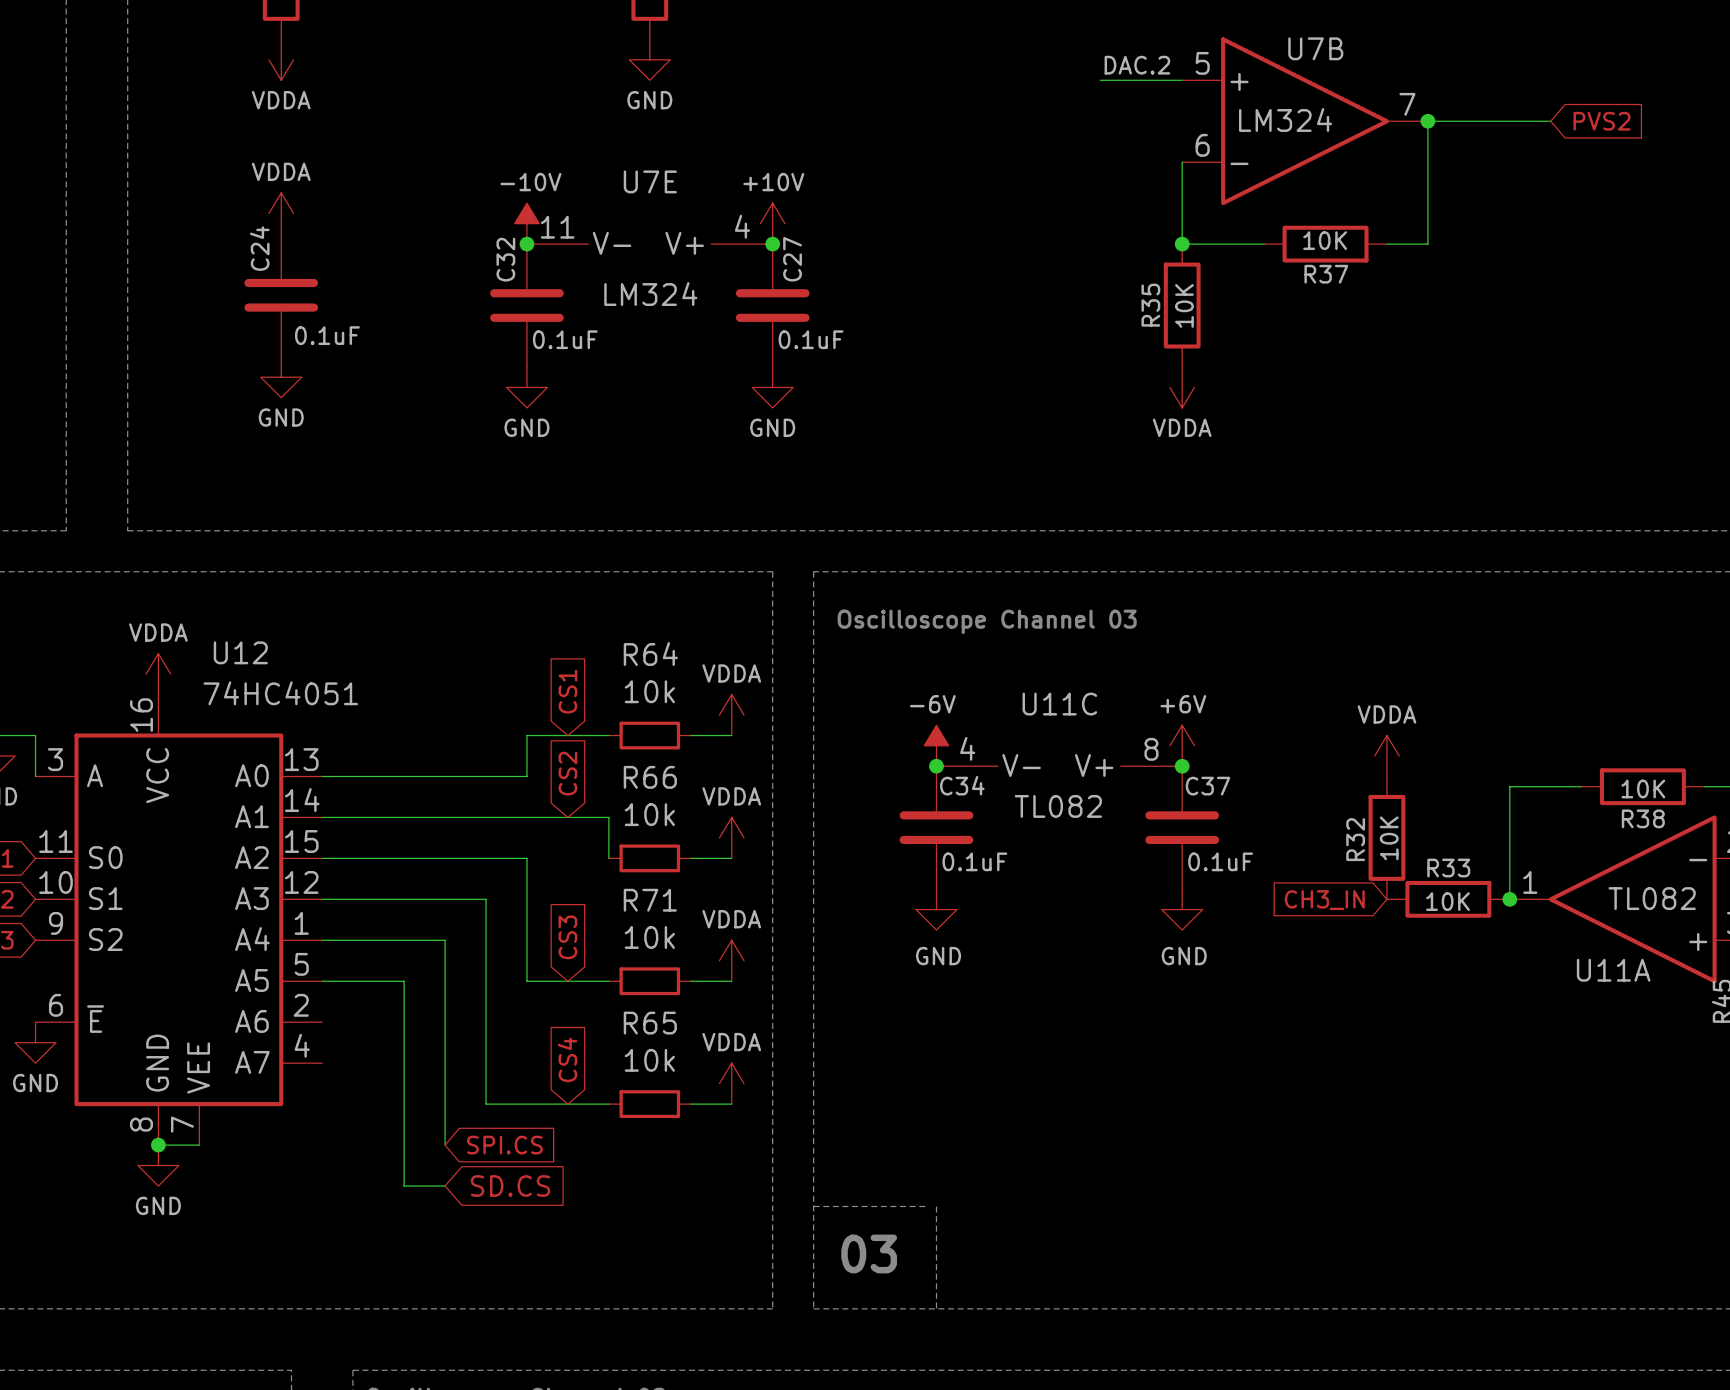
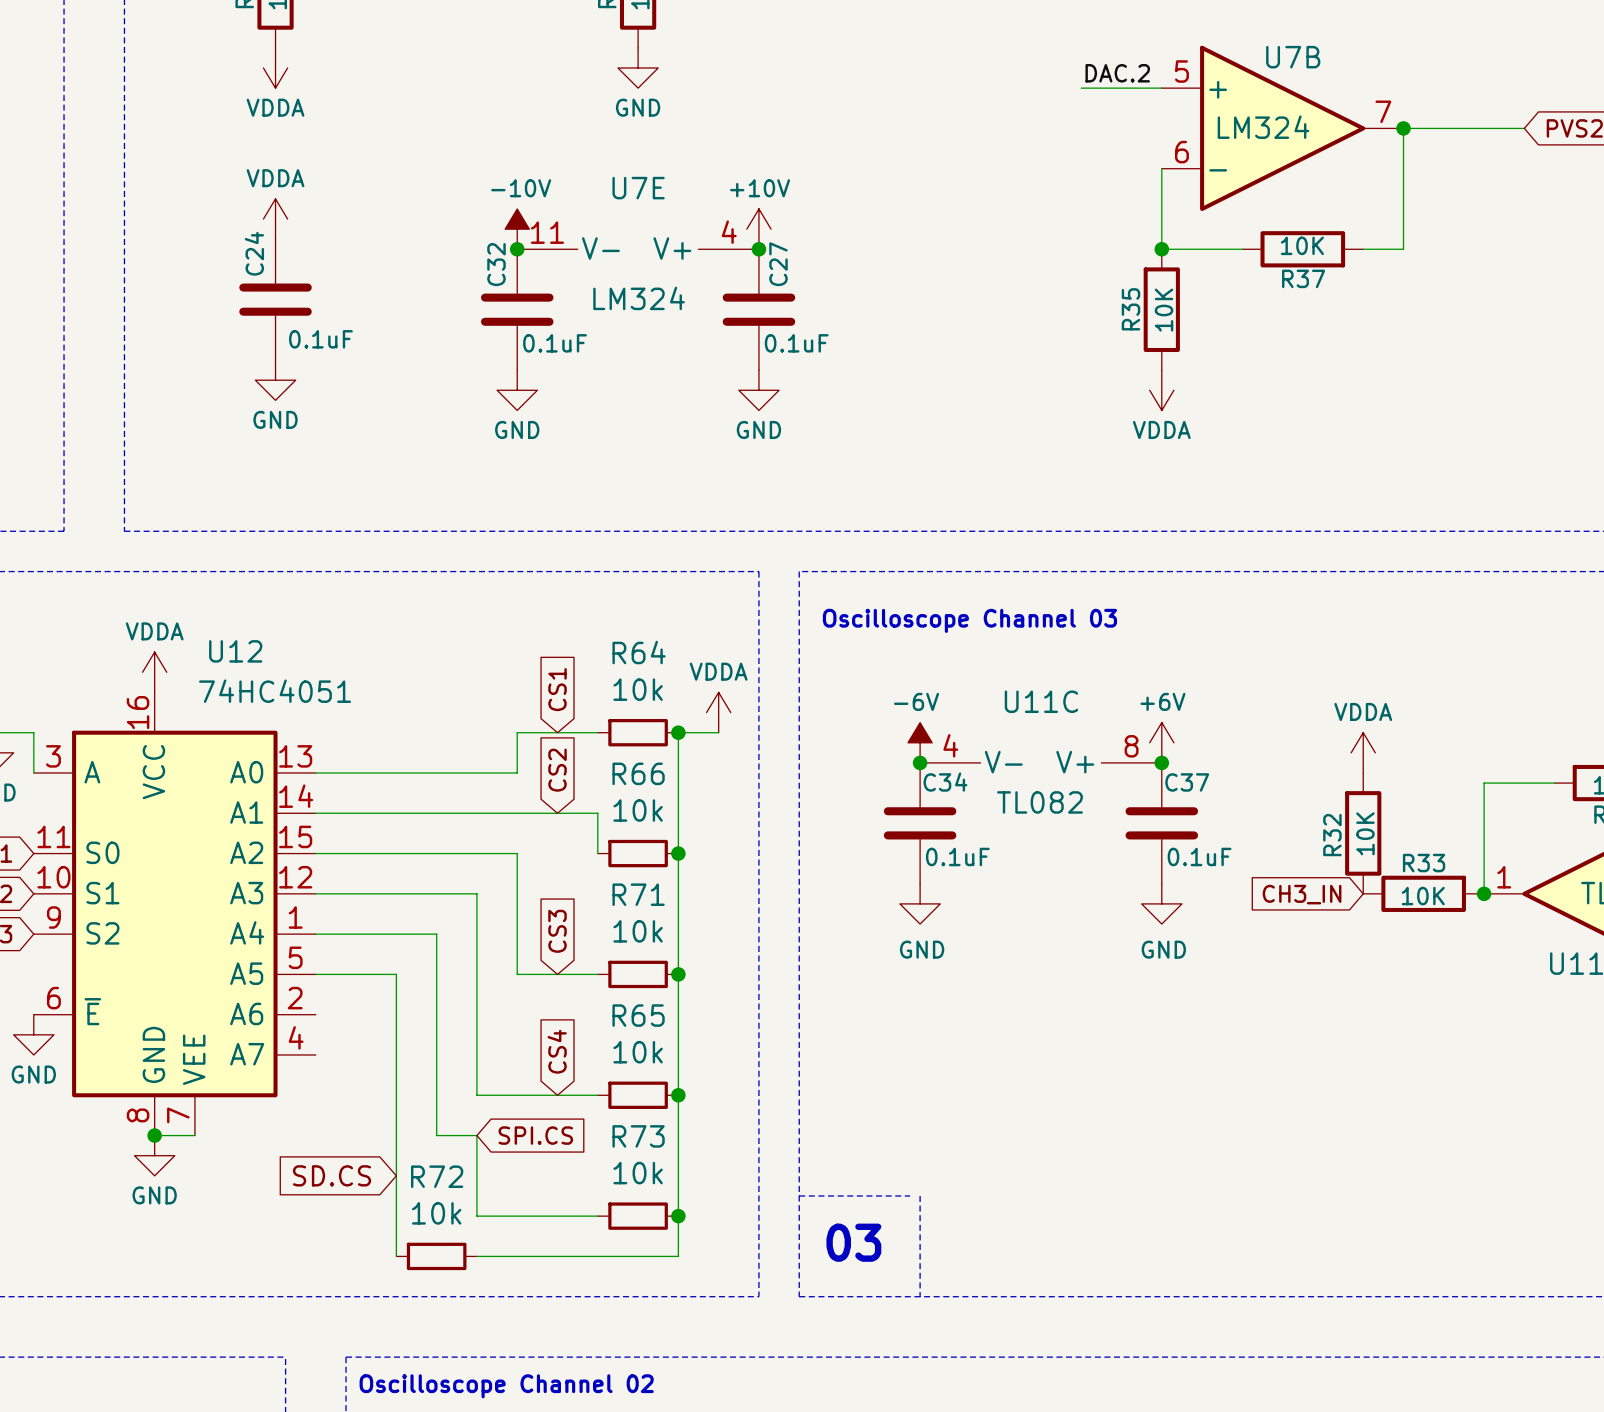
wire: none -> (678, 732) (678, 1256) (476, 1256)
junction: none -> (678, 732)
power symbol: VDDA (731, 837) -> none
wire: (690, 858) (731, 858) -> none
junction: none -> (678, 853)
power symbol: VDDA (731, 960) -> none
wire: (690, 981) (731, 981) -> none
junction: none -> (678, 974)
power symbol: VDDA (731, 1083) -> none
wire: (690, 1104) (731, 1104) -> none
junction: none -> (678, 1095)
wire: none -> (436, 1135) (476, 1135) (476, 1216) (597, 1216)
global label position: SPI.CS (504, 1145) -> SPI.CS (535, 1135)
wire: (404, 1186) (445, 1186) -> (396, 1175) (396, 1256)
global label rotation: 0° (510, 1186) -> 180° (332, 1175)
global label position: SD.CS (510, 1186) -> SD.CS (332, 1175)
R73: none -> 10k (638, 1216)
junction: none -> (678, 1216)
R72: none -> 10k (436, 1256)

